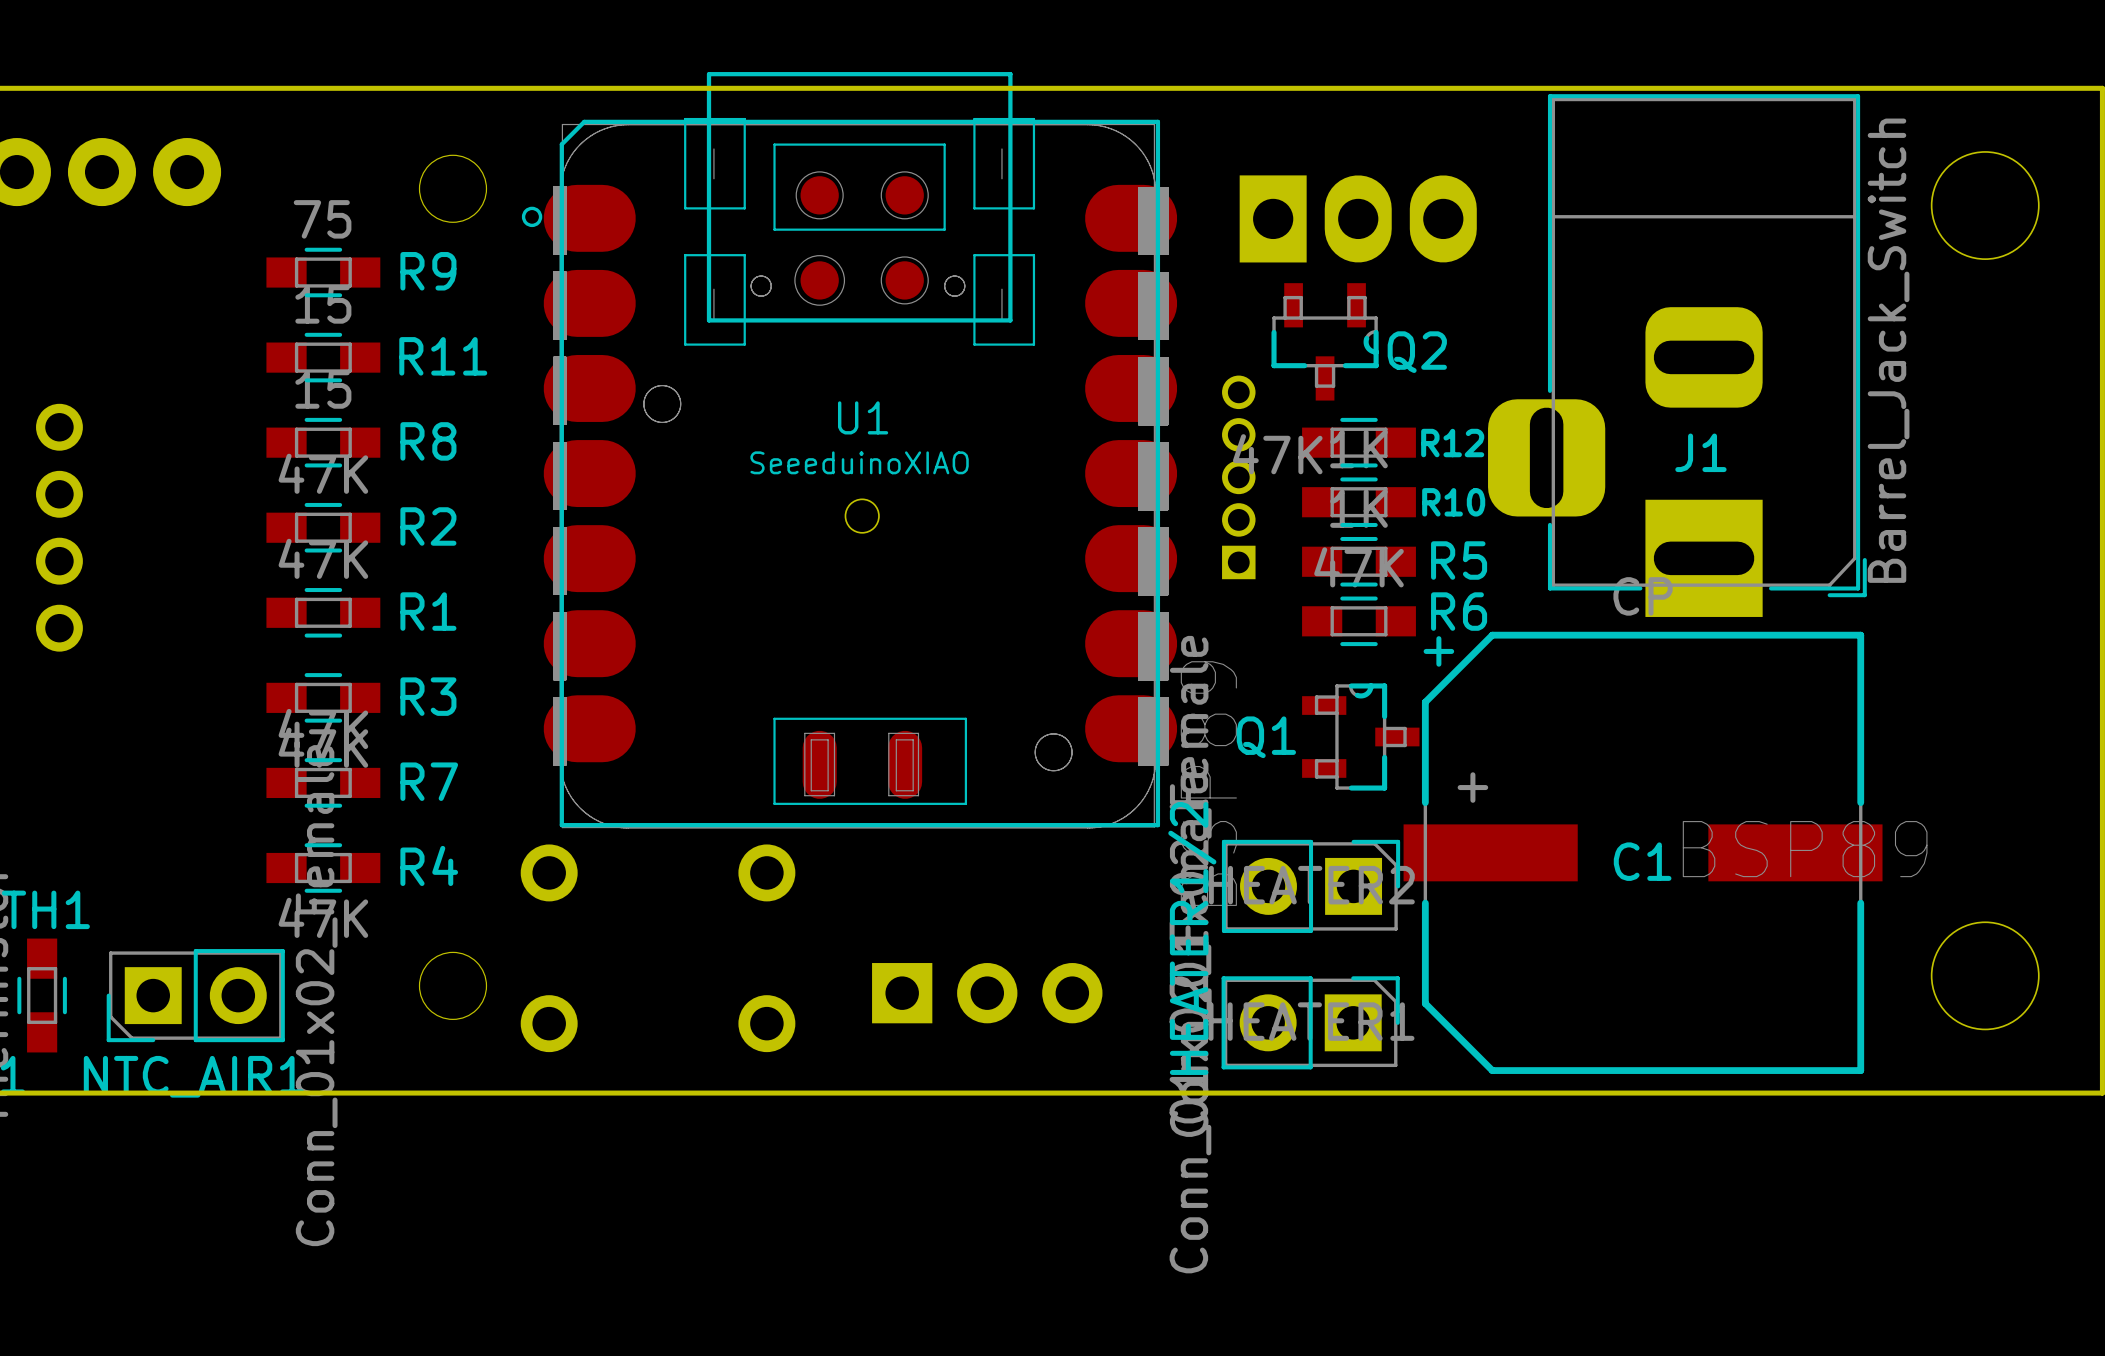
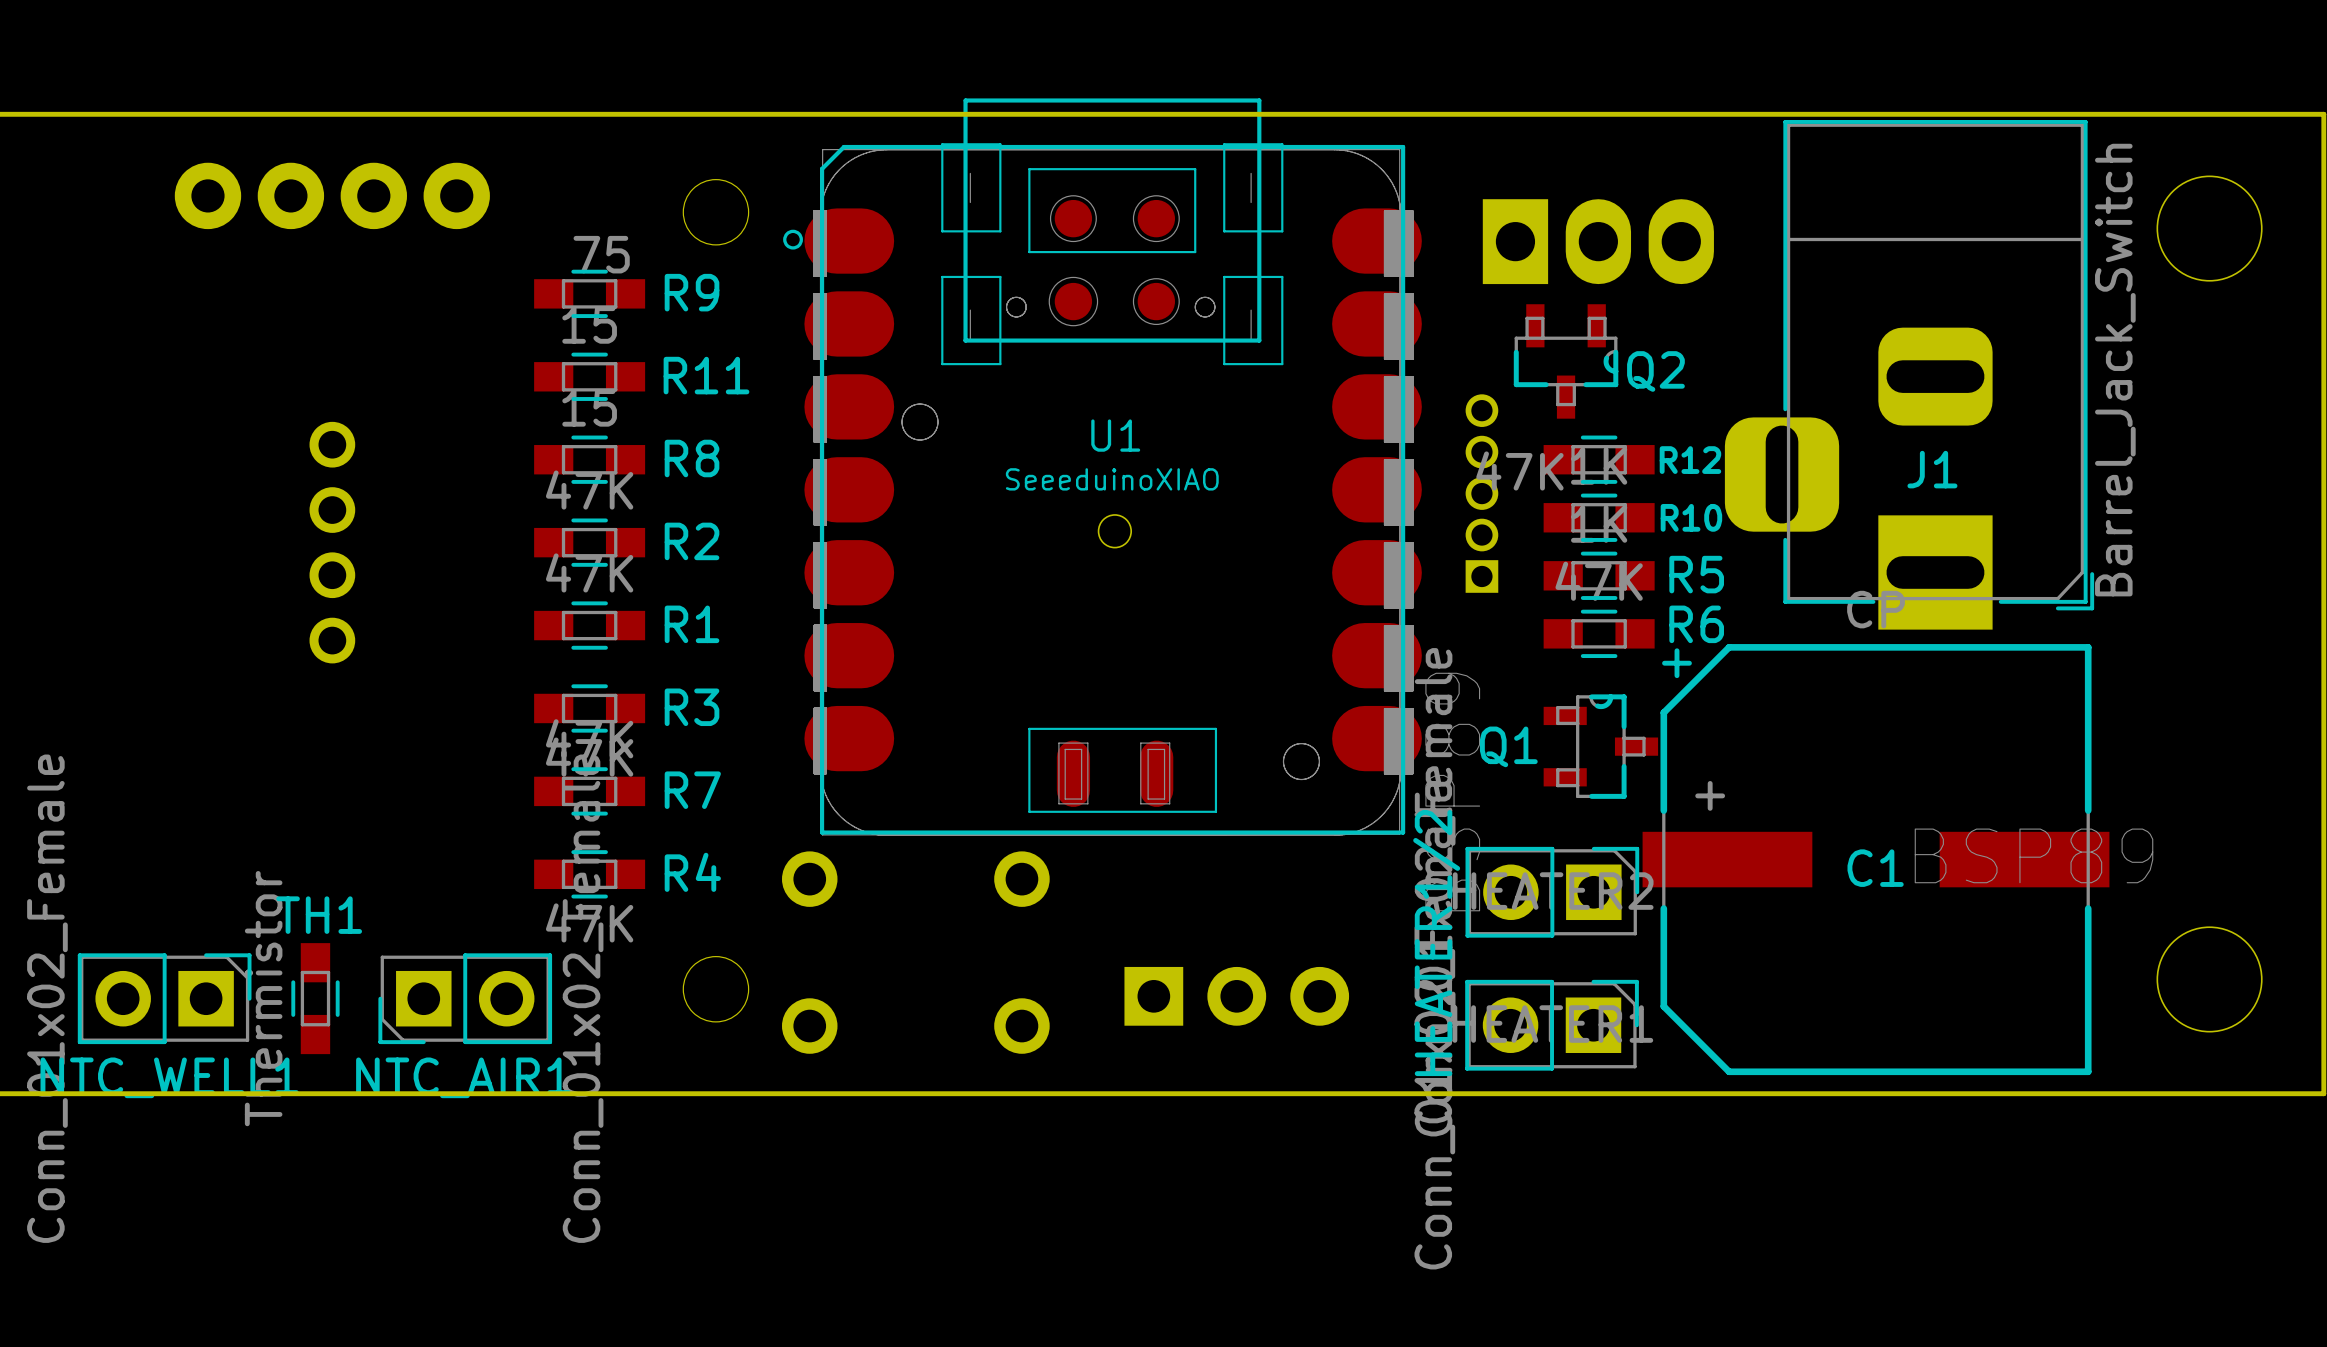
R9 value position: 75 (322, 219) -> 75 (601, 254)

